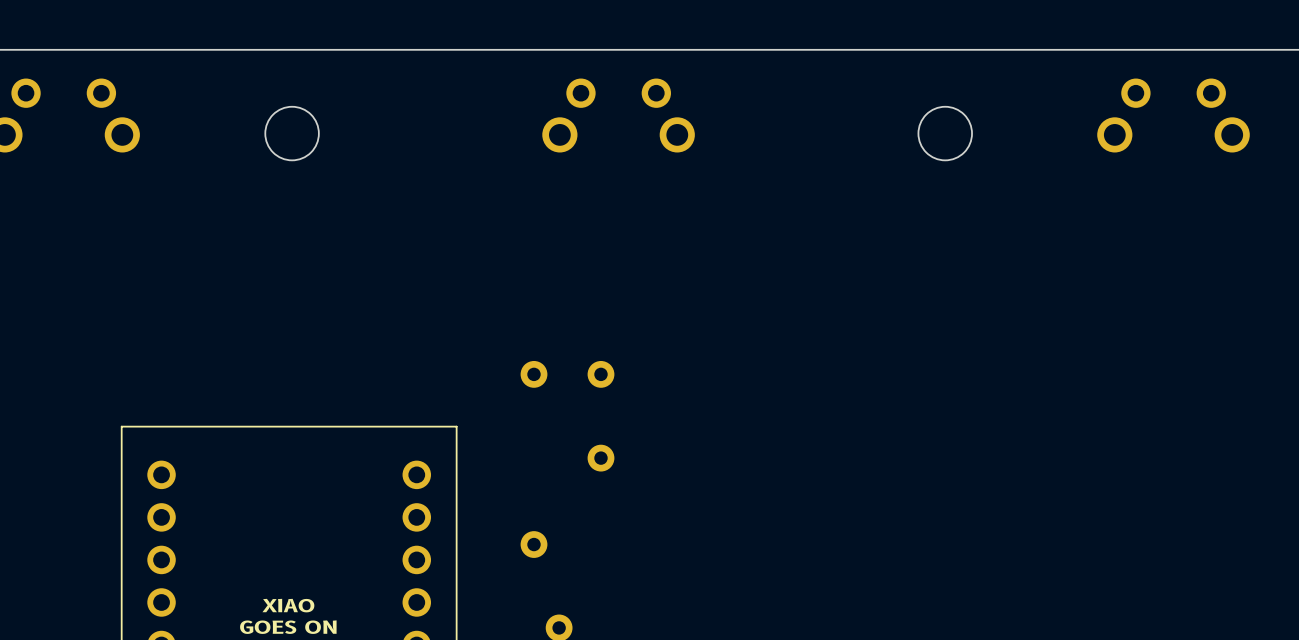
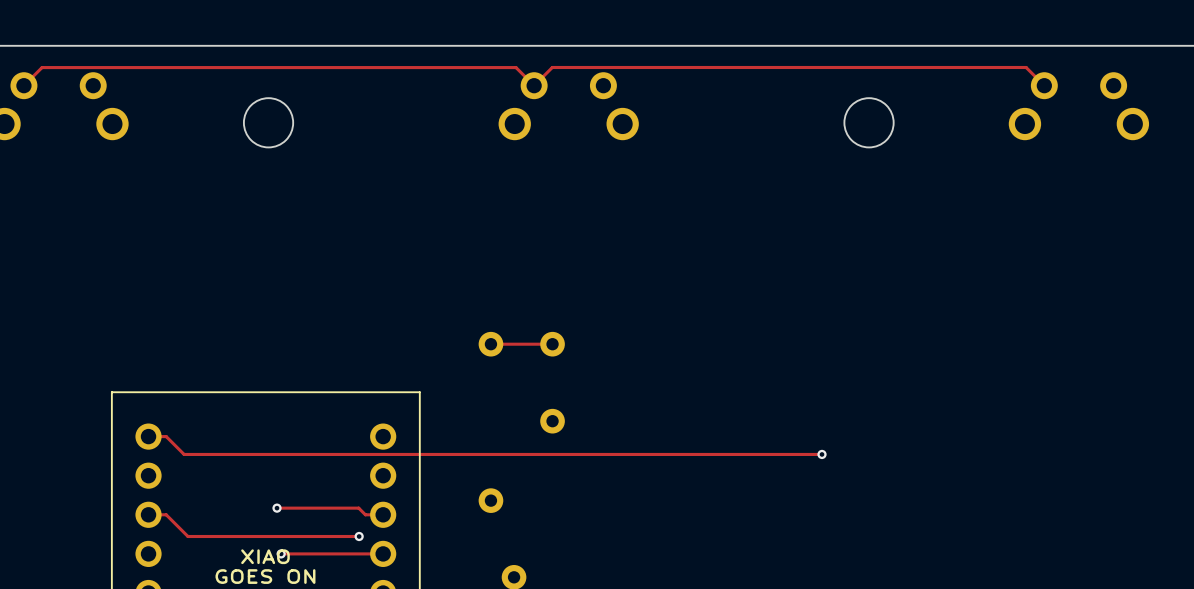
track: none -> (23, 85) (42, 67) (516, 67) (534, 85) (552, 67) (1026, 67) (1044, 85)
track: none -> (490, 344) (552, 344)
track: none -> (148, 436) (166, 436) (184, 454) (822, 454)
via: none -> (822, 454)
track: none -> (277, 508) (358, 508) (365, 514) (383, 514)
via: none -> (277, 508)
track: none -> (148, 514) (166, 514) (187, 536) (359, 536)
via: none -> (359, 536)
track: none -> (281, 553) (383, 553)
via: none -> (281, 553)

